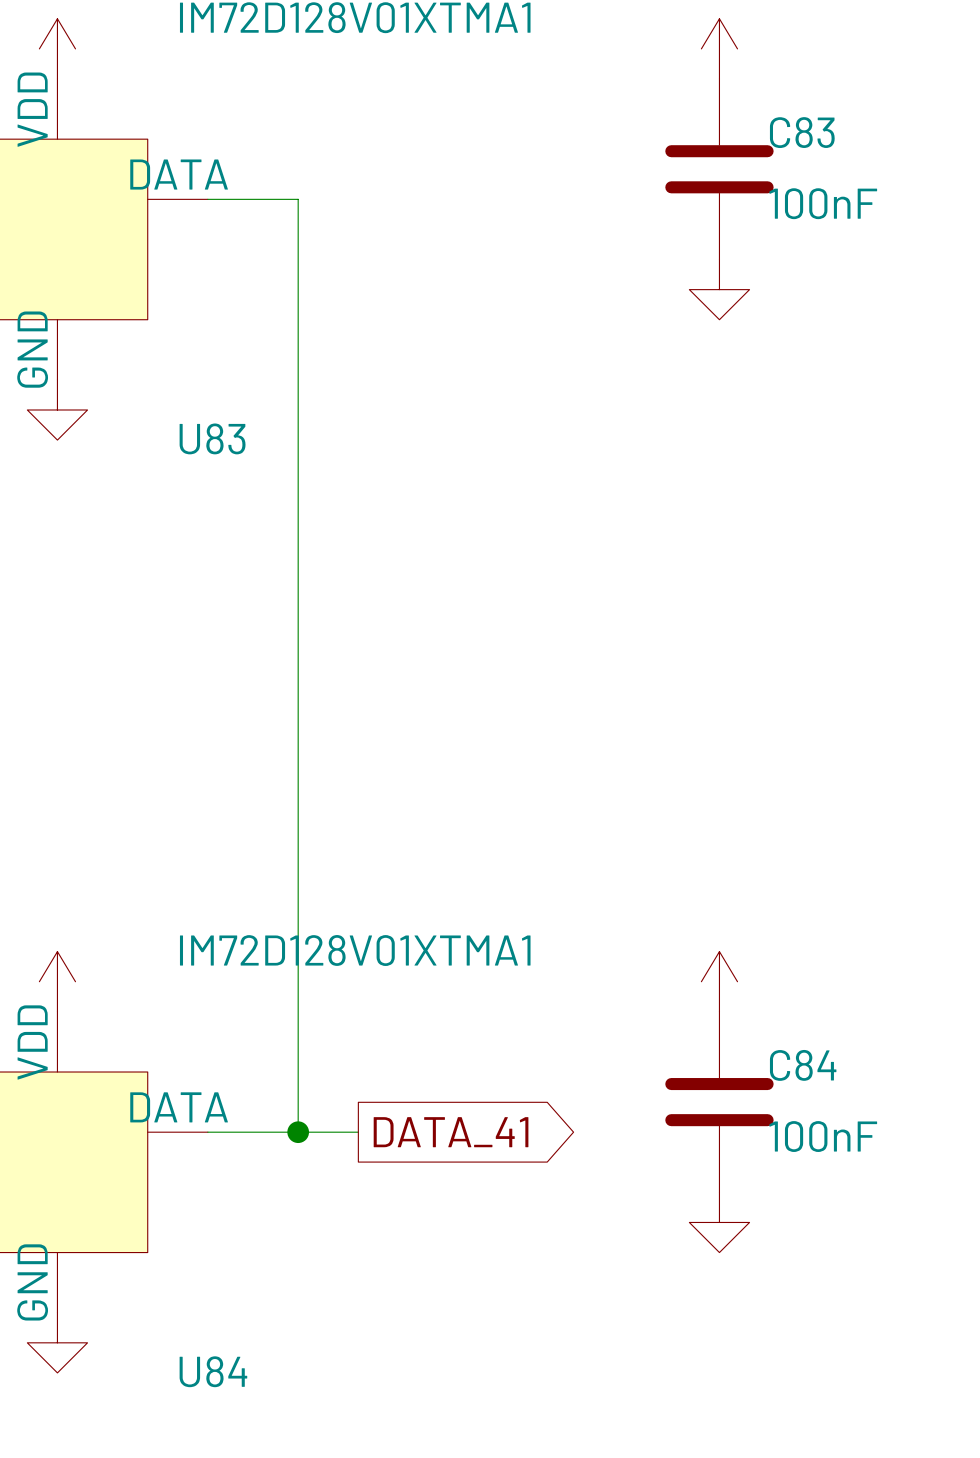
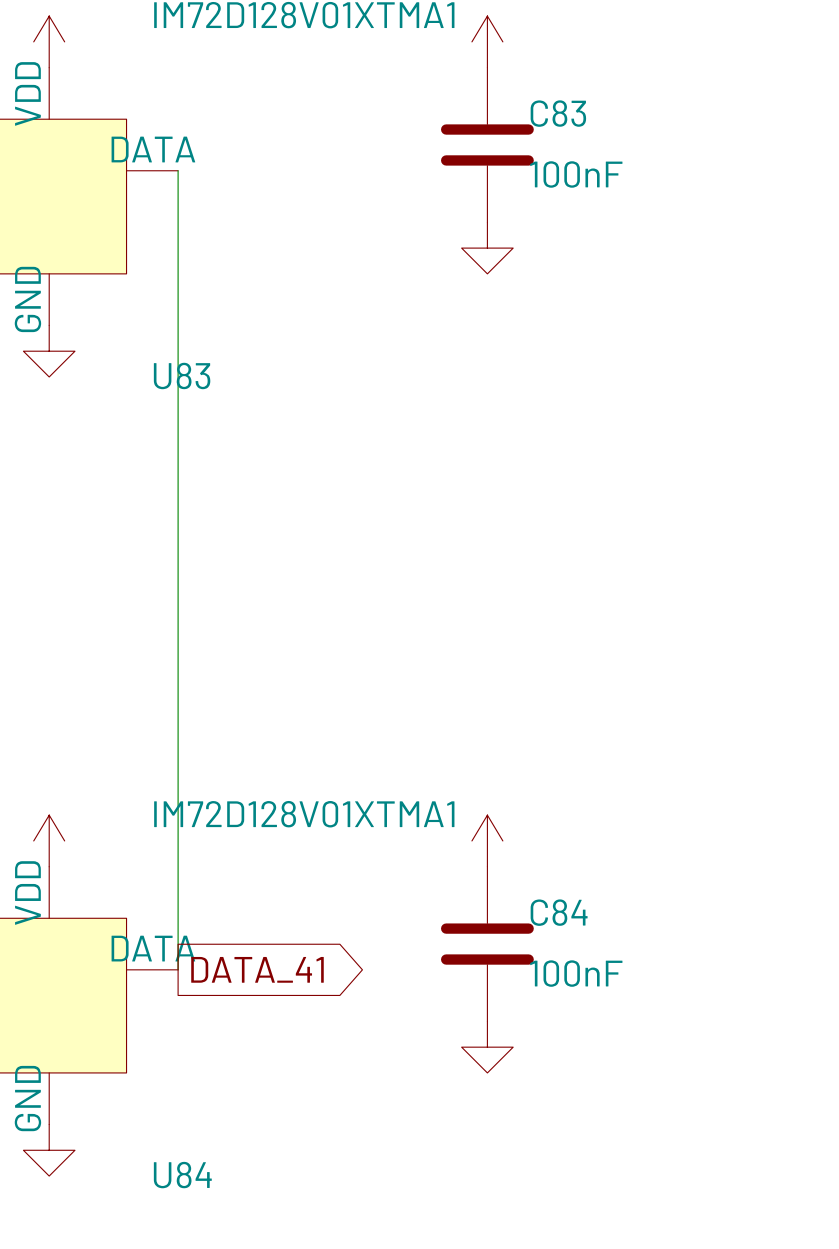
power symbol position: (719, 48) -> (487, 41)
C83 position: (719, 169) -> (487, 144)
wire: (207, 199) (298, 199) (298, 1132) -> (178, 170) (178, 969)
power symbol position: (719, 289) -> (487, 248)
power symbol position: (719, 981) -> (487, 840)
C84 position: (719, 1102) -> (487, 944)
wire: (207, 1132) (358, 1132) -> none
junction: (298, 1132) -> none
global label position: DATA_41 (451, 1132) -> DATA_41 (257, 969)
power symbol position: (719, 1222) -> (487, 1047)

